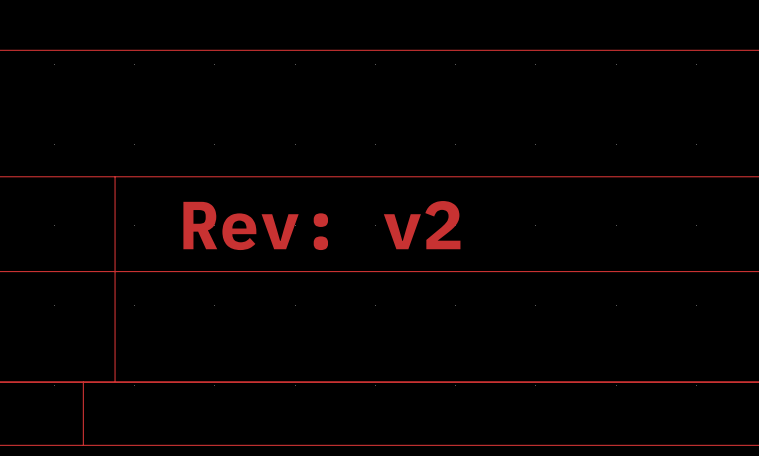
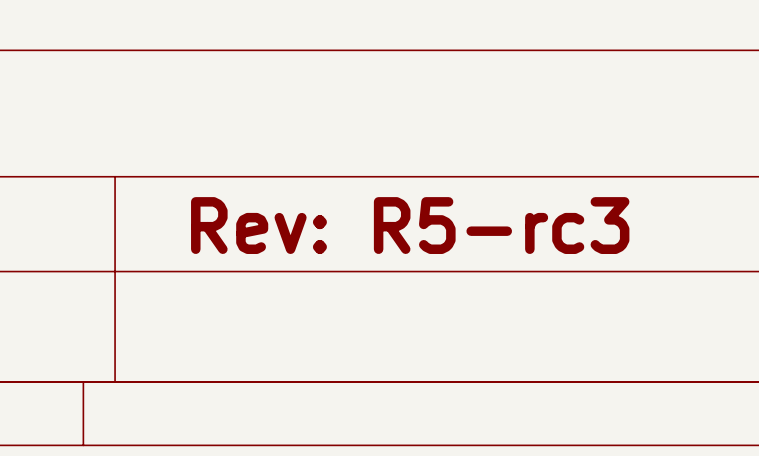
title block: Rev: v2 (321, 225) -> Rev: R5-rc3 (410, 225)

